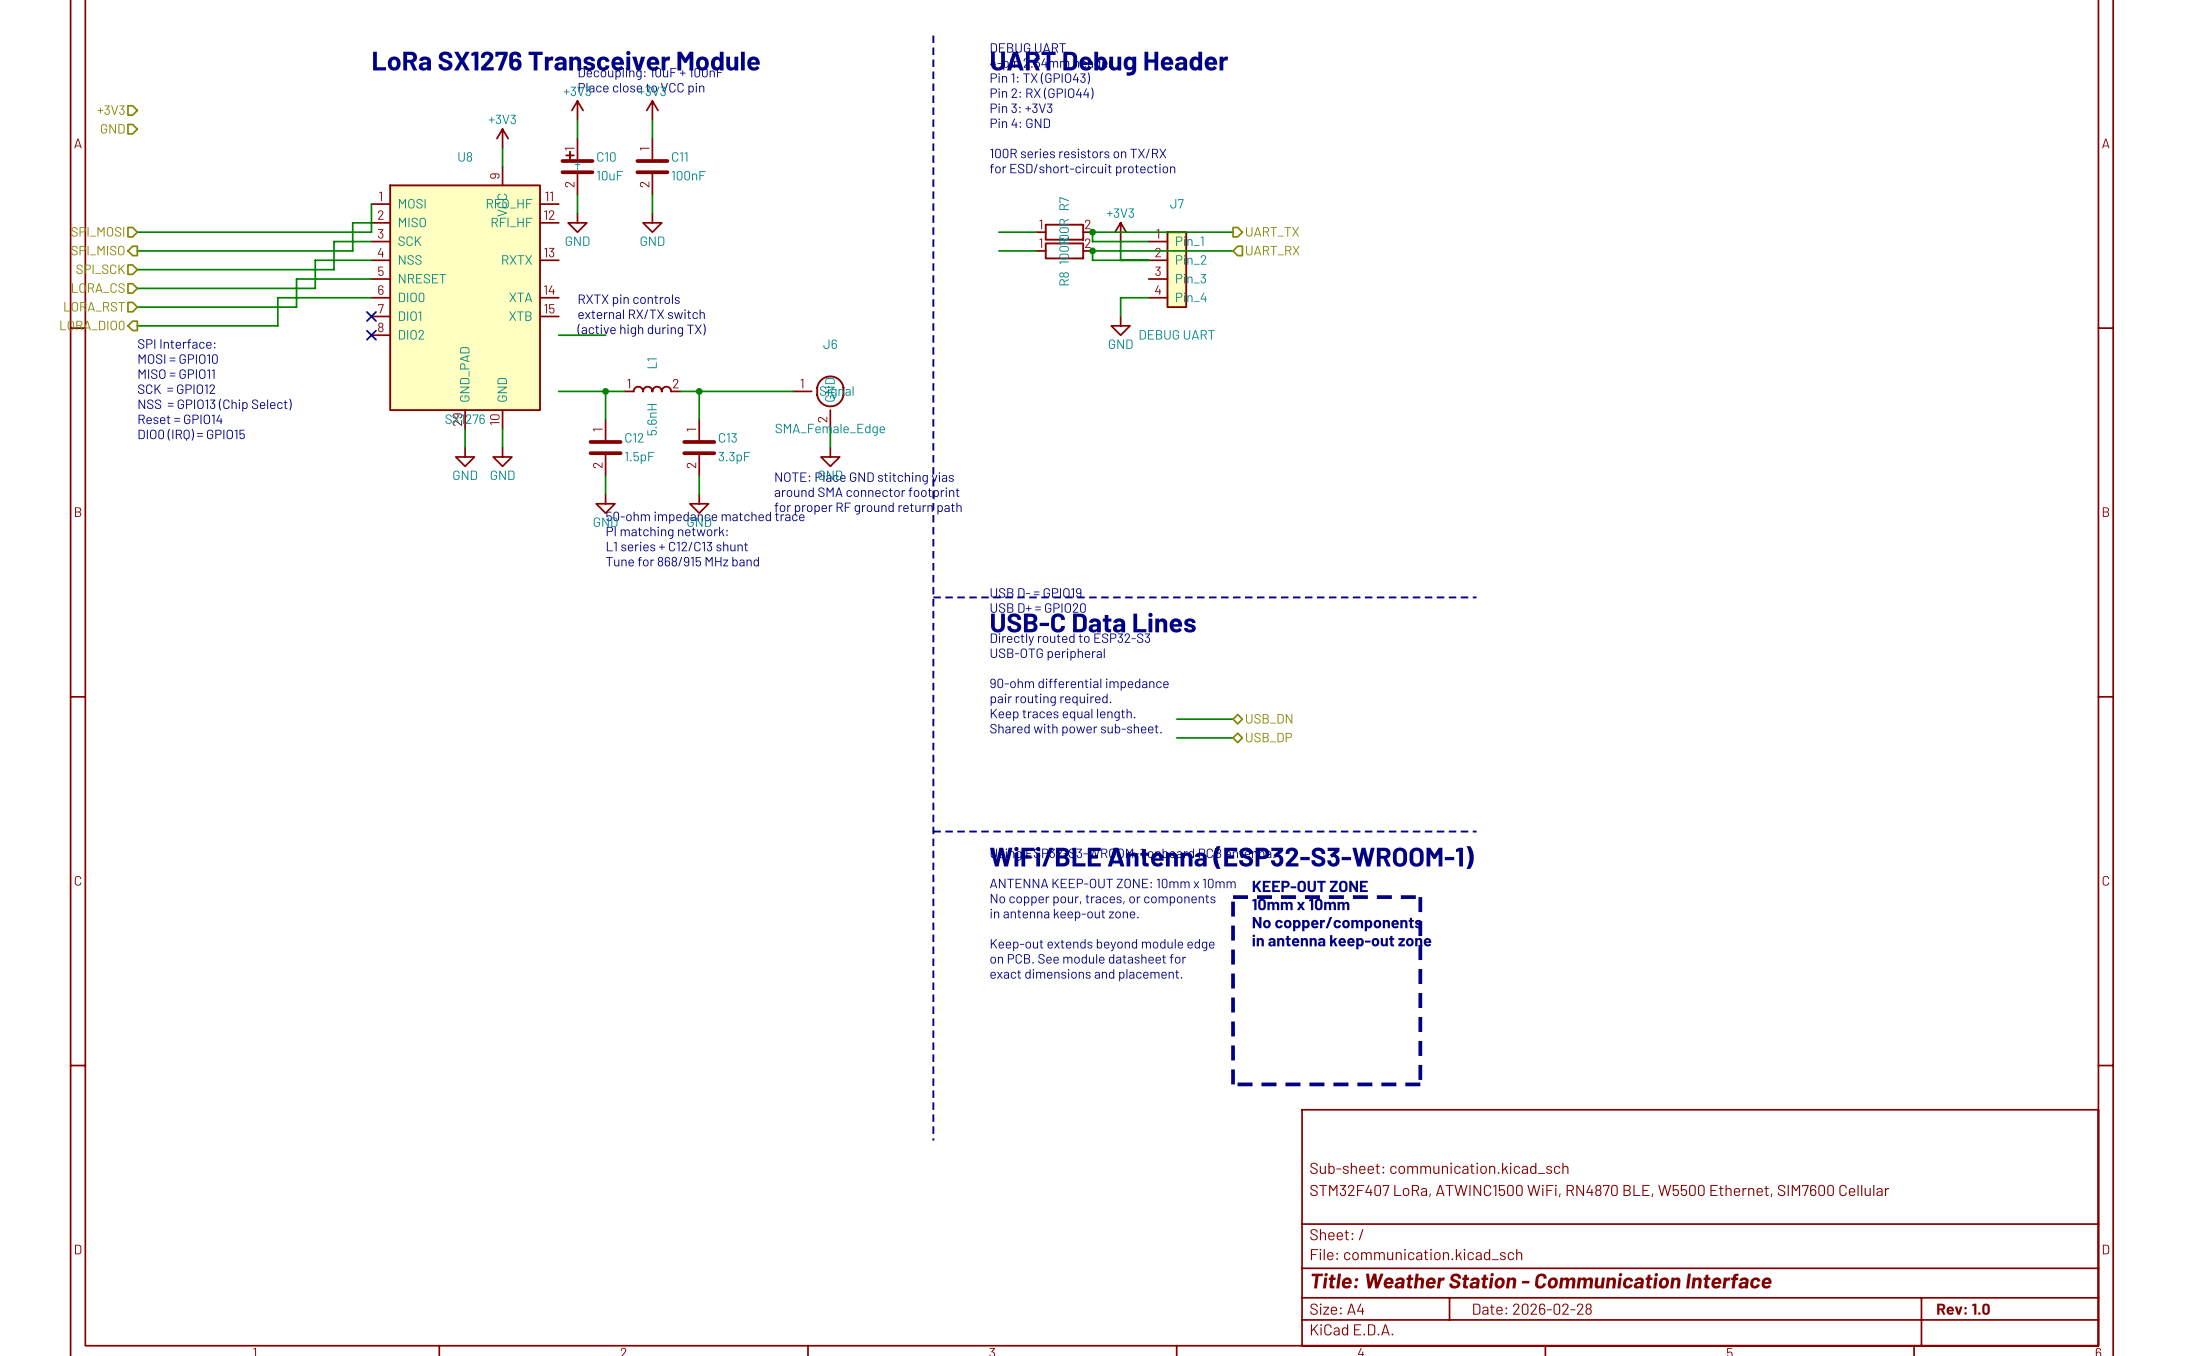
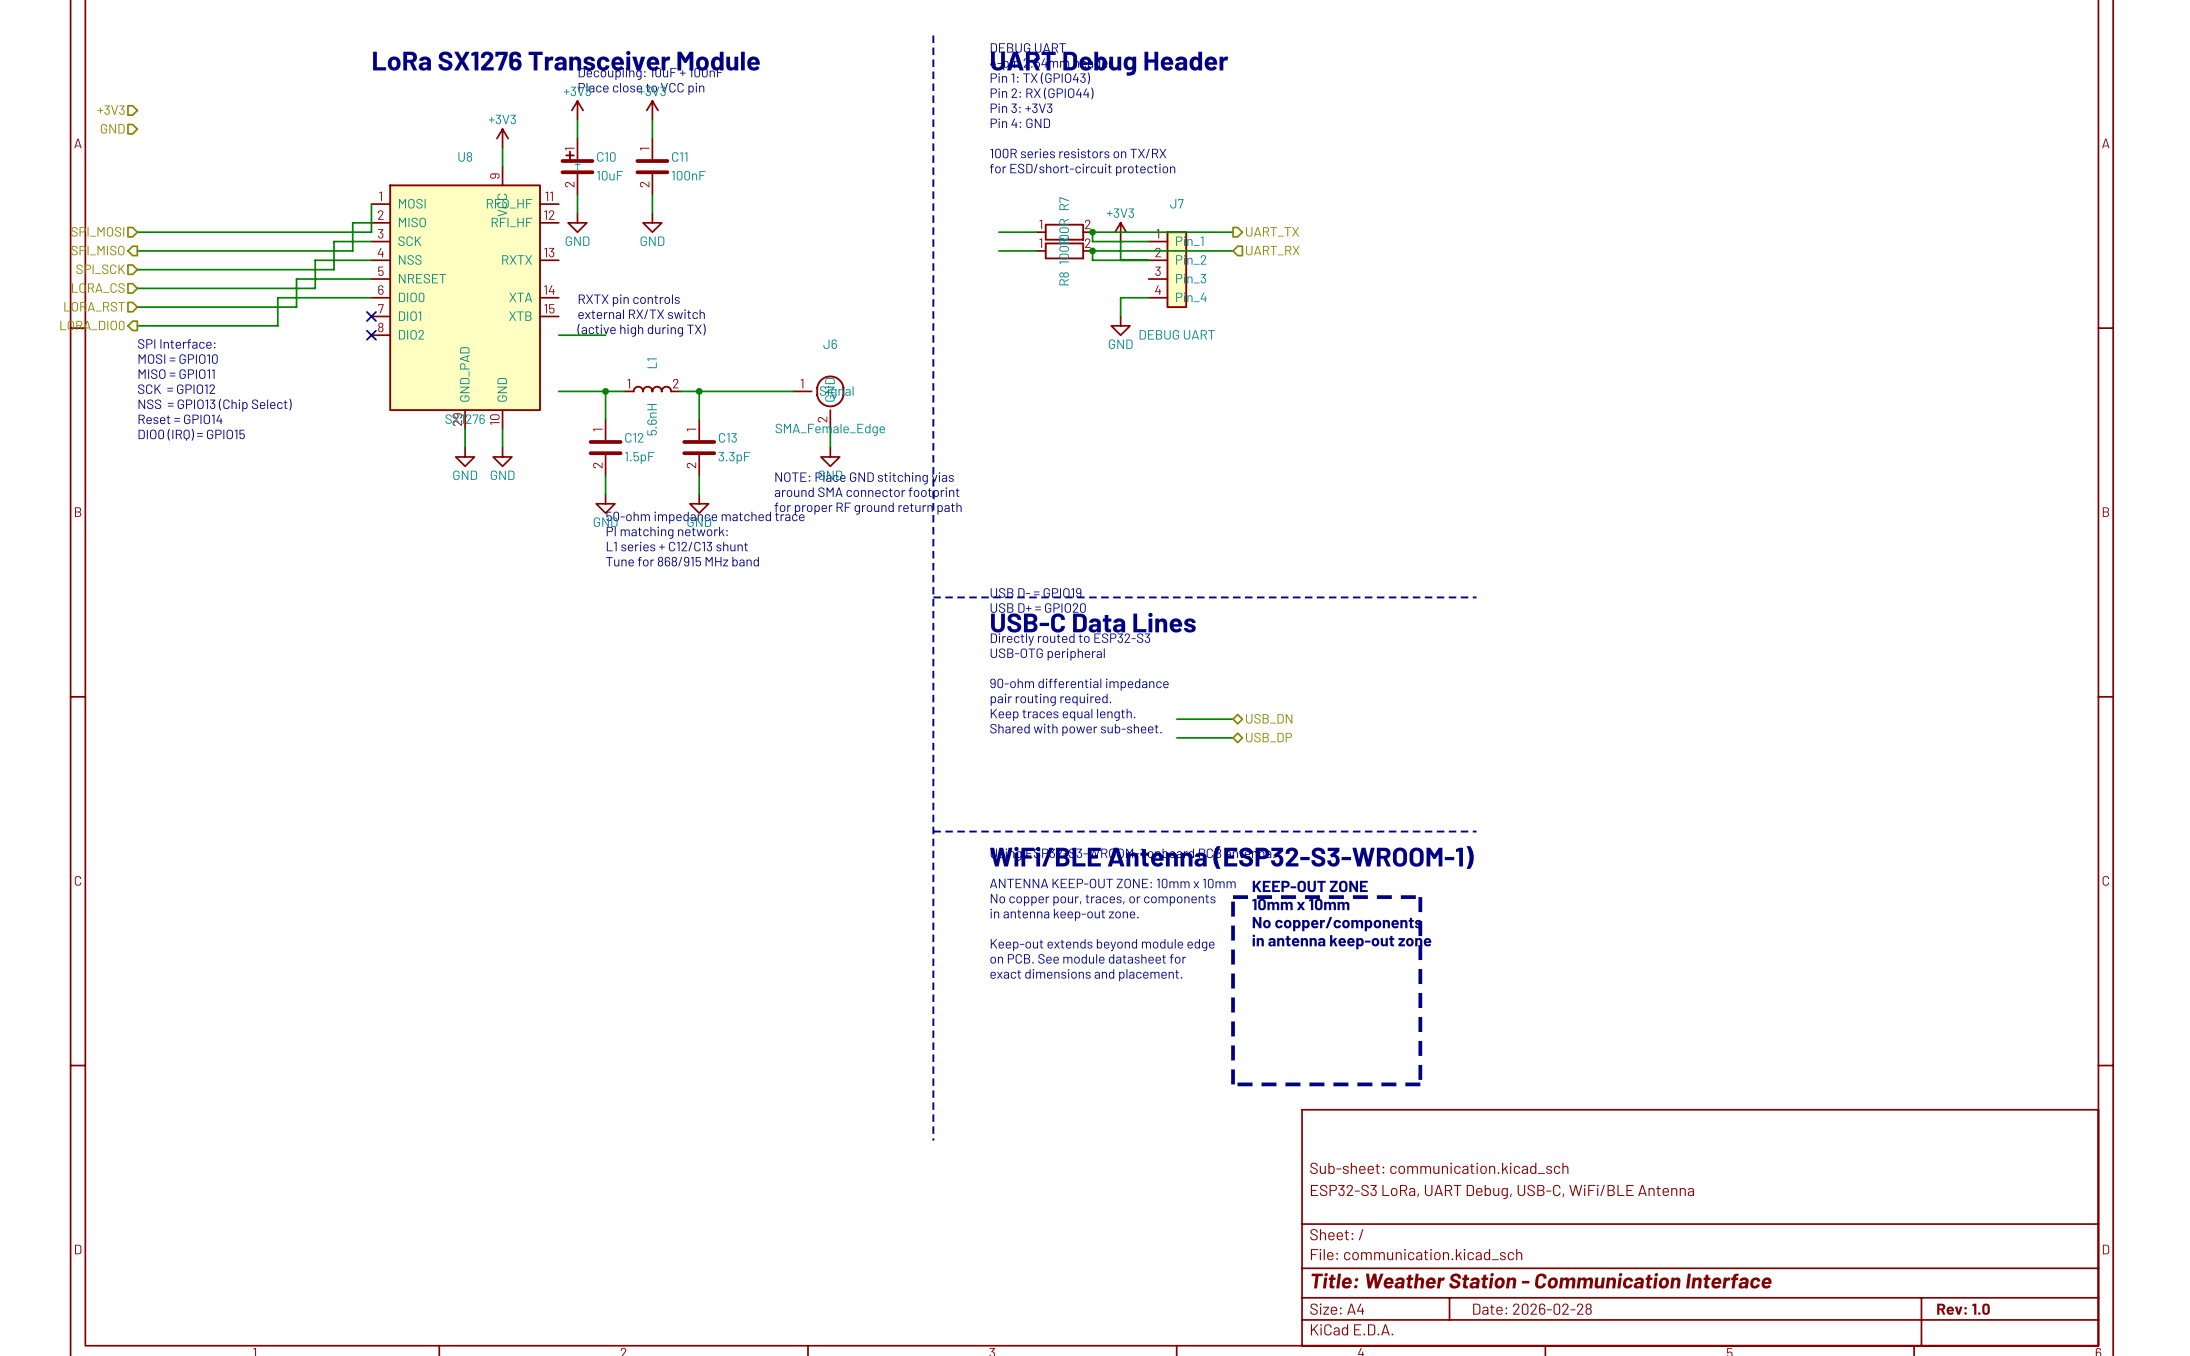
title block: STM32F407 LoRa, ATWINC1500 WiFi, RN4870 BLE, W5500 Ethernet, SIM7600 Cellular (1599, 1191) -> ESP32-S3 LoRa, UART Debug, USB-C, WiFi/BLE Antenna (1502, 1191)

